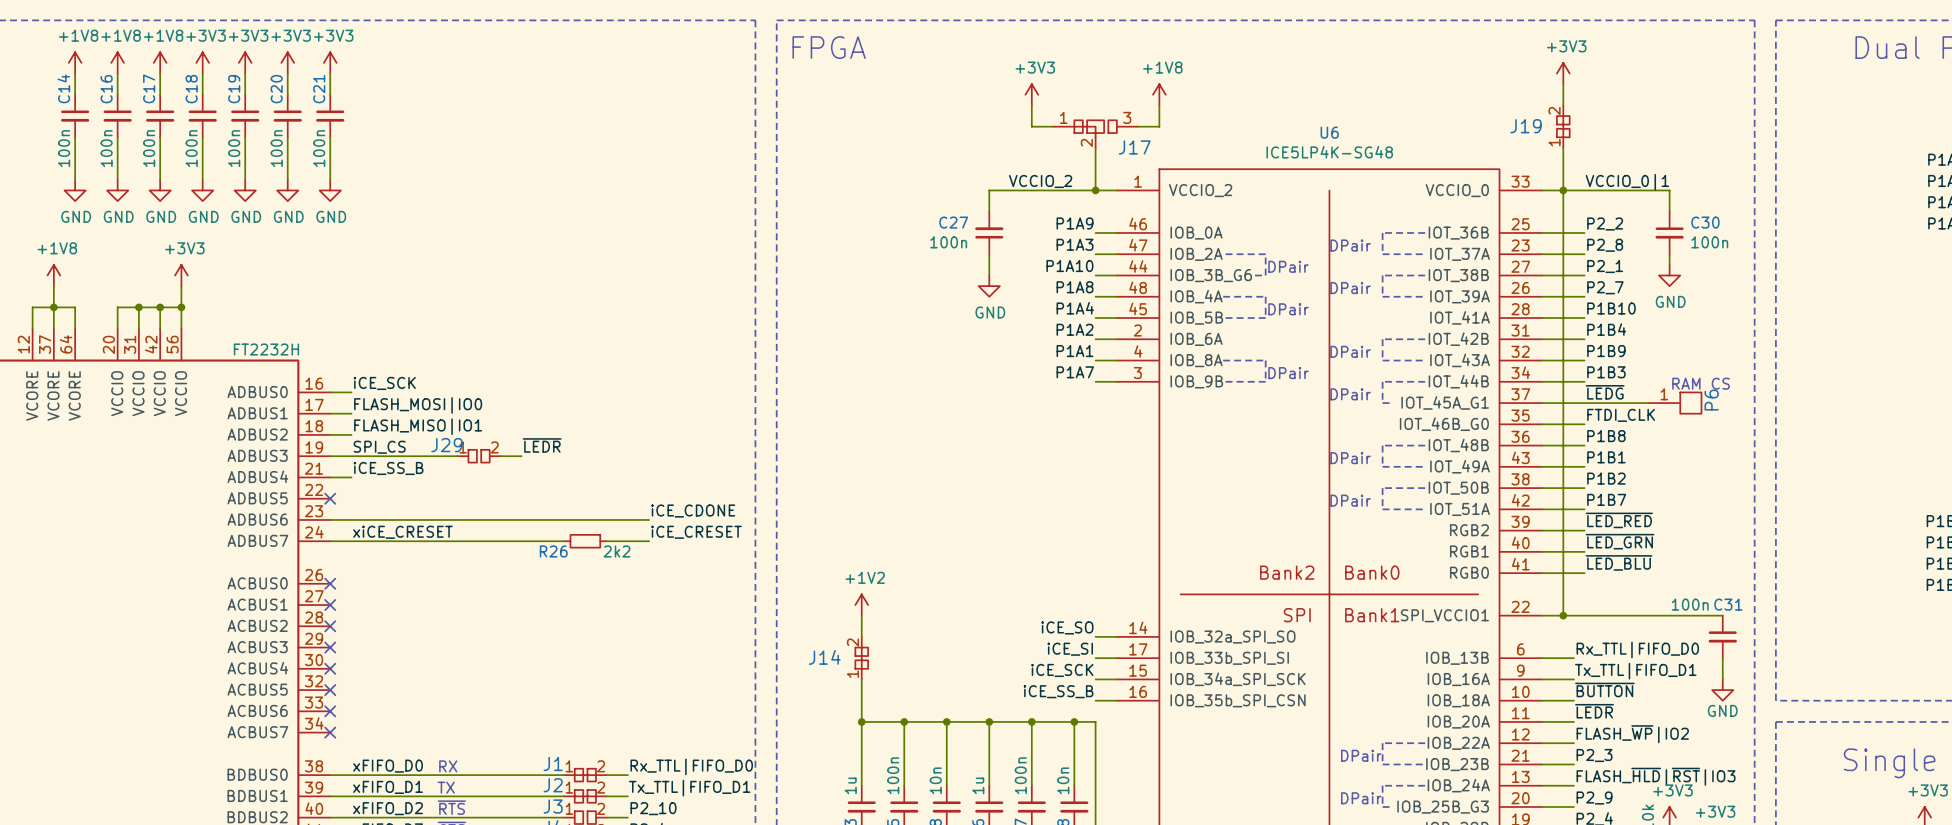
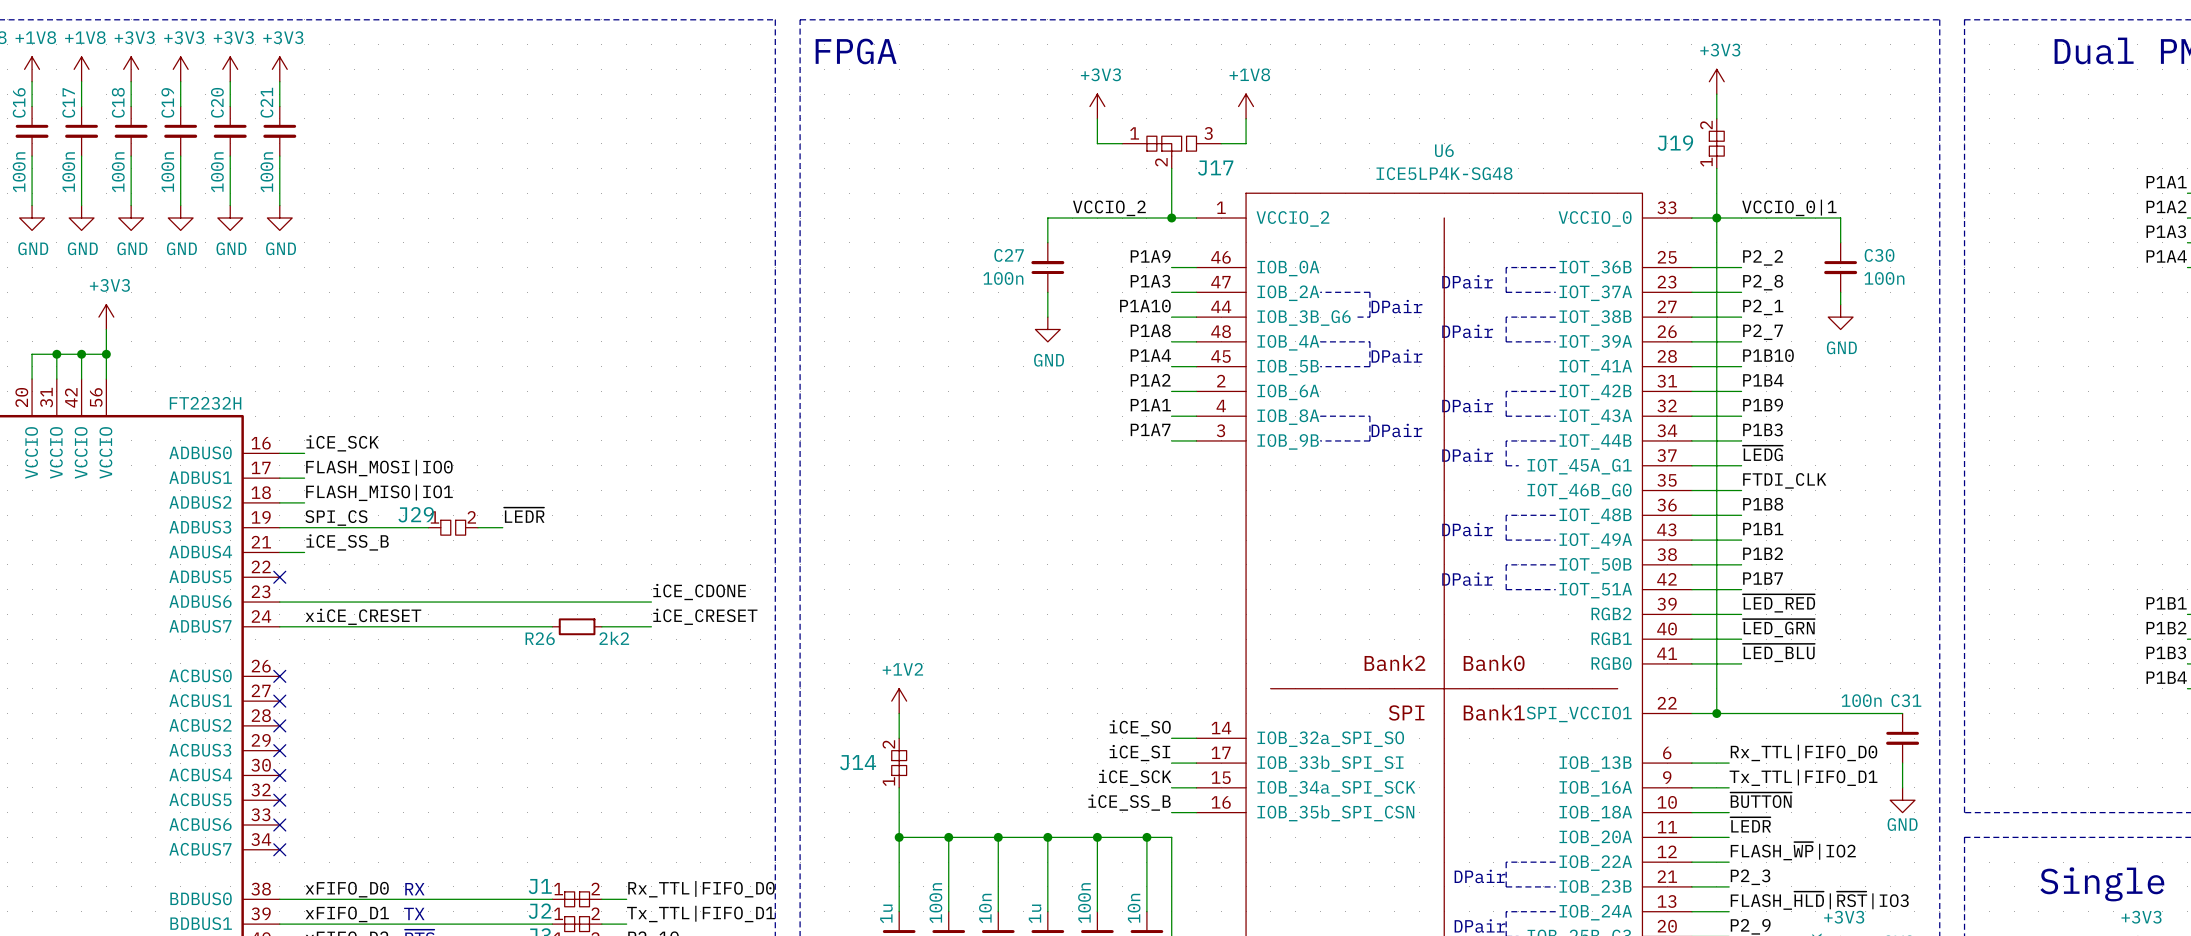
text: RAM CS (1701, 383) -> none
wire: (1584, 403) (1648, 403) -> none
P6: (1674, 403) -> none

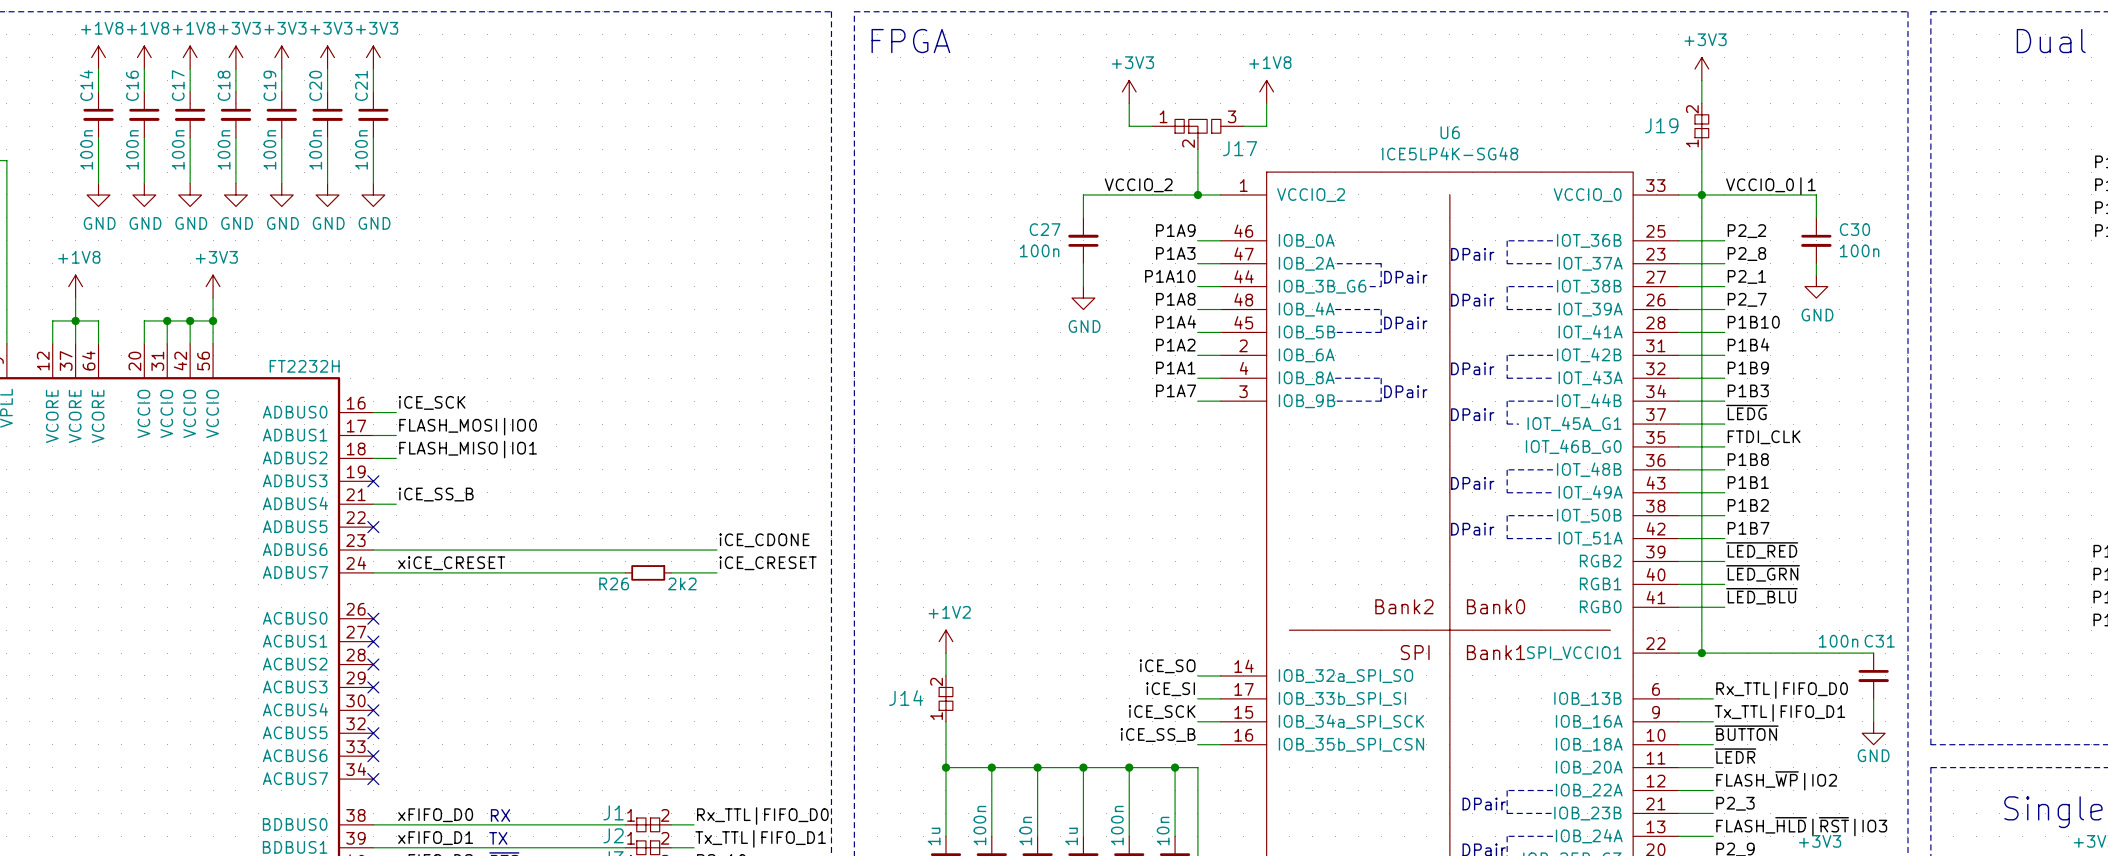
label: ~{LEDR} (524, 515) -> none
label: SPI_CS (336, 518) -> none
wire: (279, 527) (428, 527) -> none
no-connect mark: none -> (373, 481)
J29: (453, 527) -> none
wire: (477, 527) (502, 527) -> none

